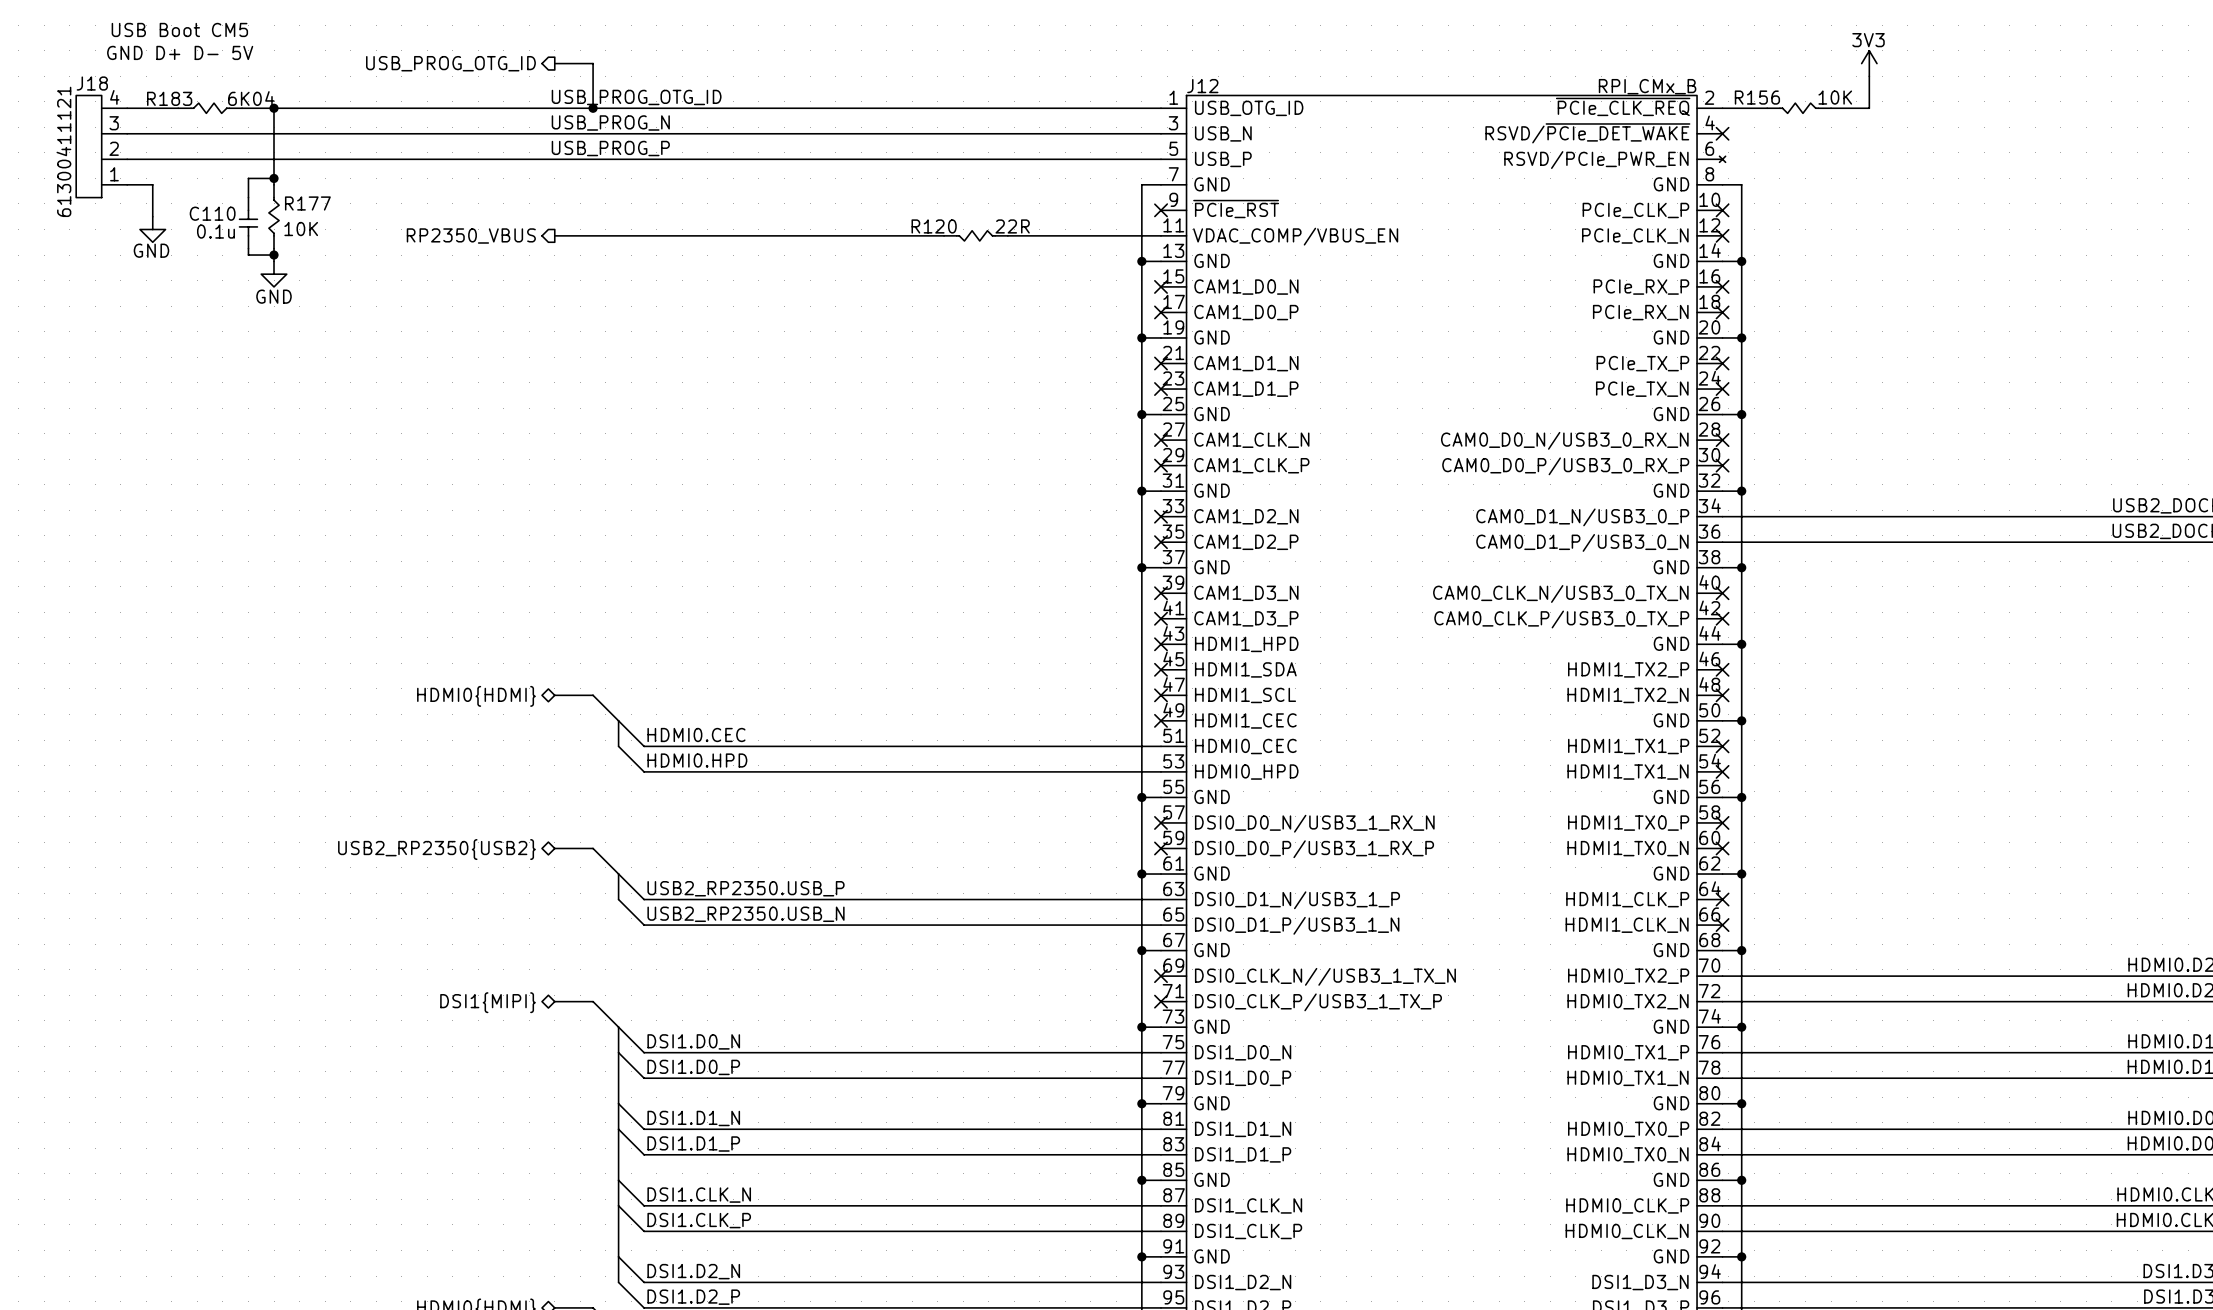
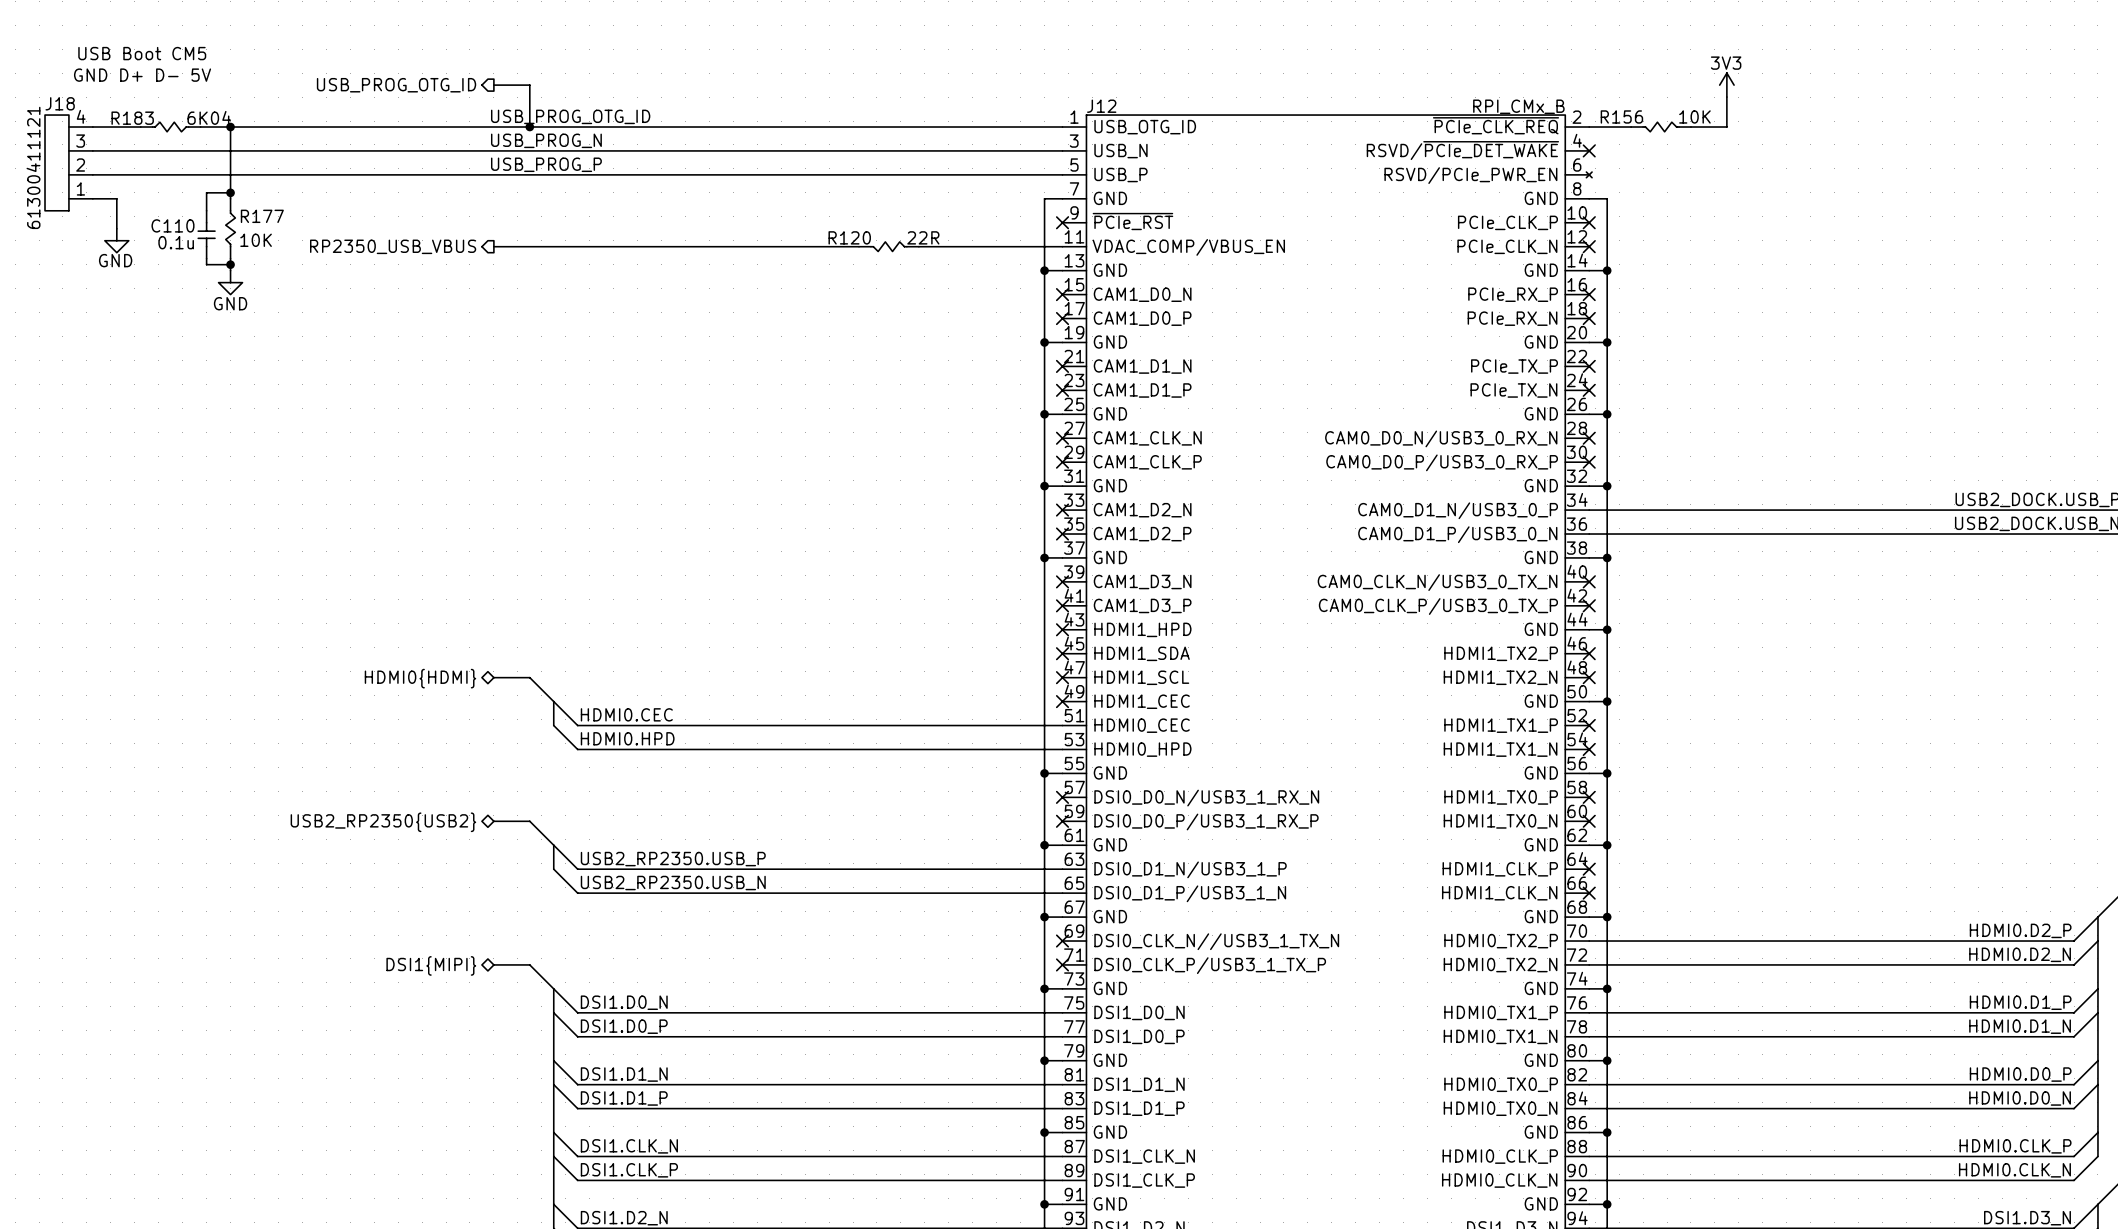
hierarchical label: RP2350_VBUS (471, 236) -> RP2350_USB_VBUS (393, 246)

